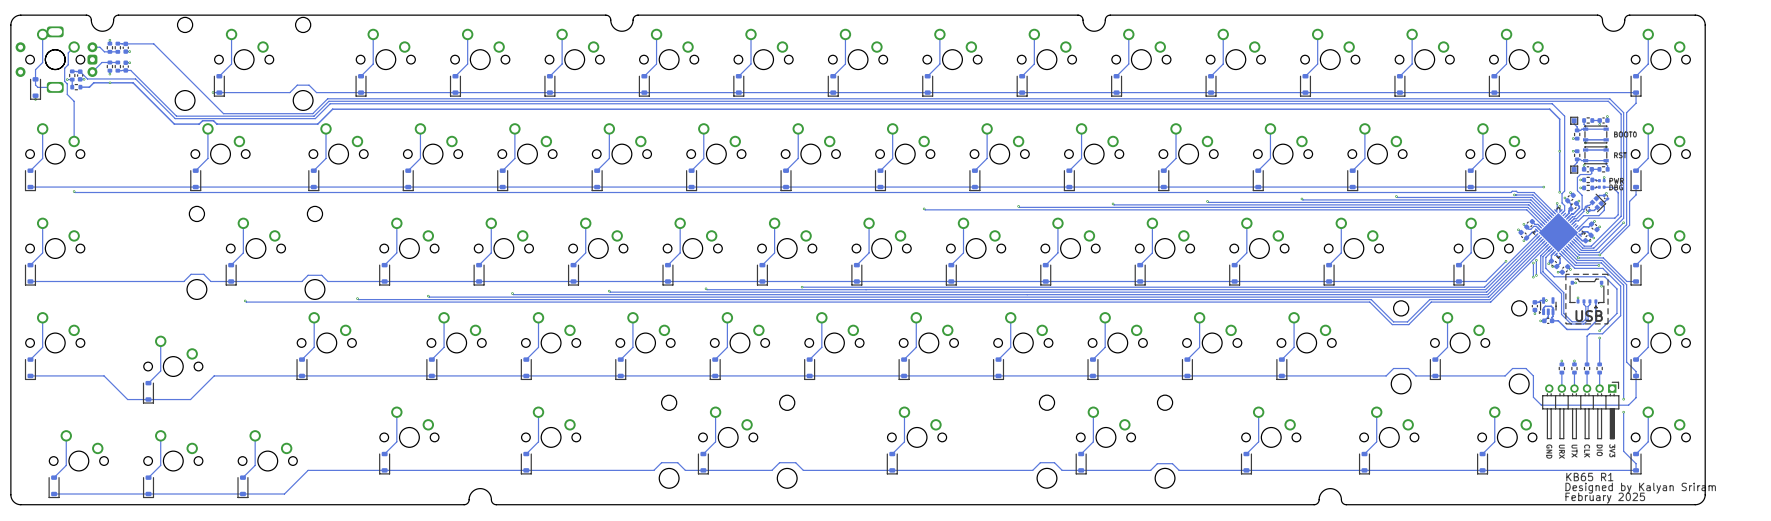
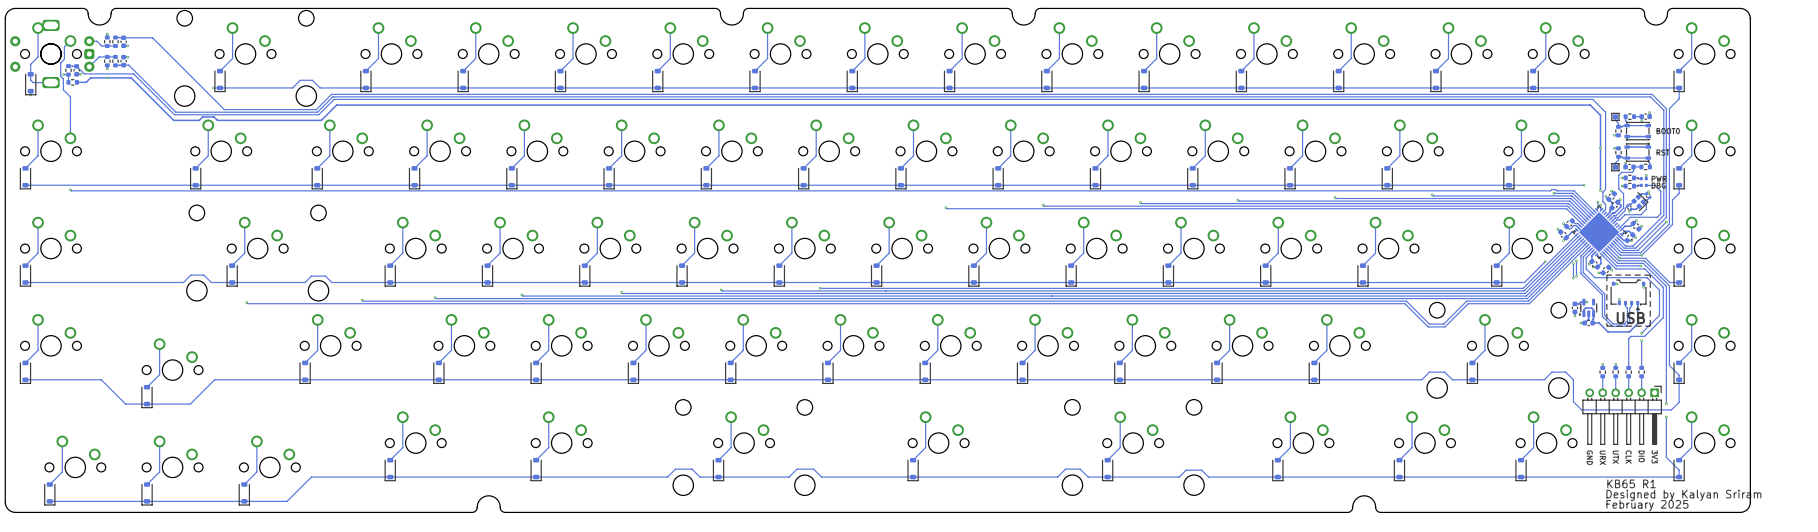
board edge: (1705, 25) (1702, 18) (1695, 15) (1628, 15) (1625, 17) (1621, 27) (1613, 31) (1605, 27) (1601, 17) (1597, 15) (1110, 15) (1106, 17) (1102, 27) (1094, 31) (1086, 27) (1082, 17) (1078, 15) (638, 15) (633, 17) (629, 28) (621, 31) (614, 28) (610, 17) (605, 15) (118, 15) (114, 17) (110, 27) (102, 31) (94, 27) (90, 17) (87, 15) (20, 15) (13, 18) (10, 25) -> (1750, 18) (1747, 11) (1740, 8) (1671, 8) (1668, 10) (1664, 21) (1656, 25) (1647, 21) (1643, 10) (1639, 8) (1040, 8) (1036, 10) (1031, 21) (1023, 25) (1015, 21) (1011, 10) (1007, 8) (747, 8) (744, 10) (740, 21) (731, 25) (723, 21) (719, 10) (715, 8) (116, 8) (111, 10) (107, 22) (99, 25) (91, 21) (87, 11) (84, 8) (15, 8) (8, 11) (5, 18)

